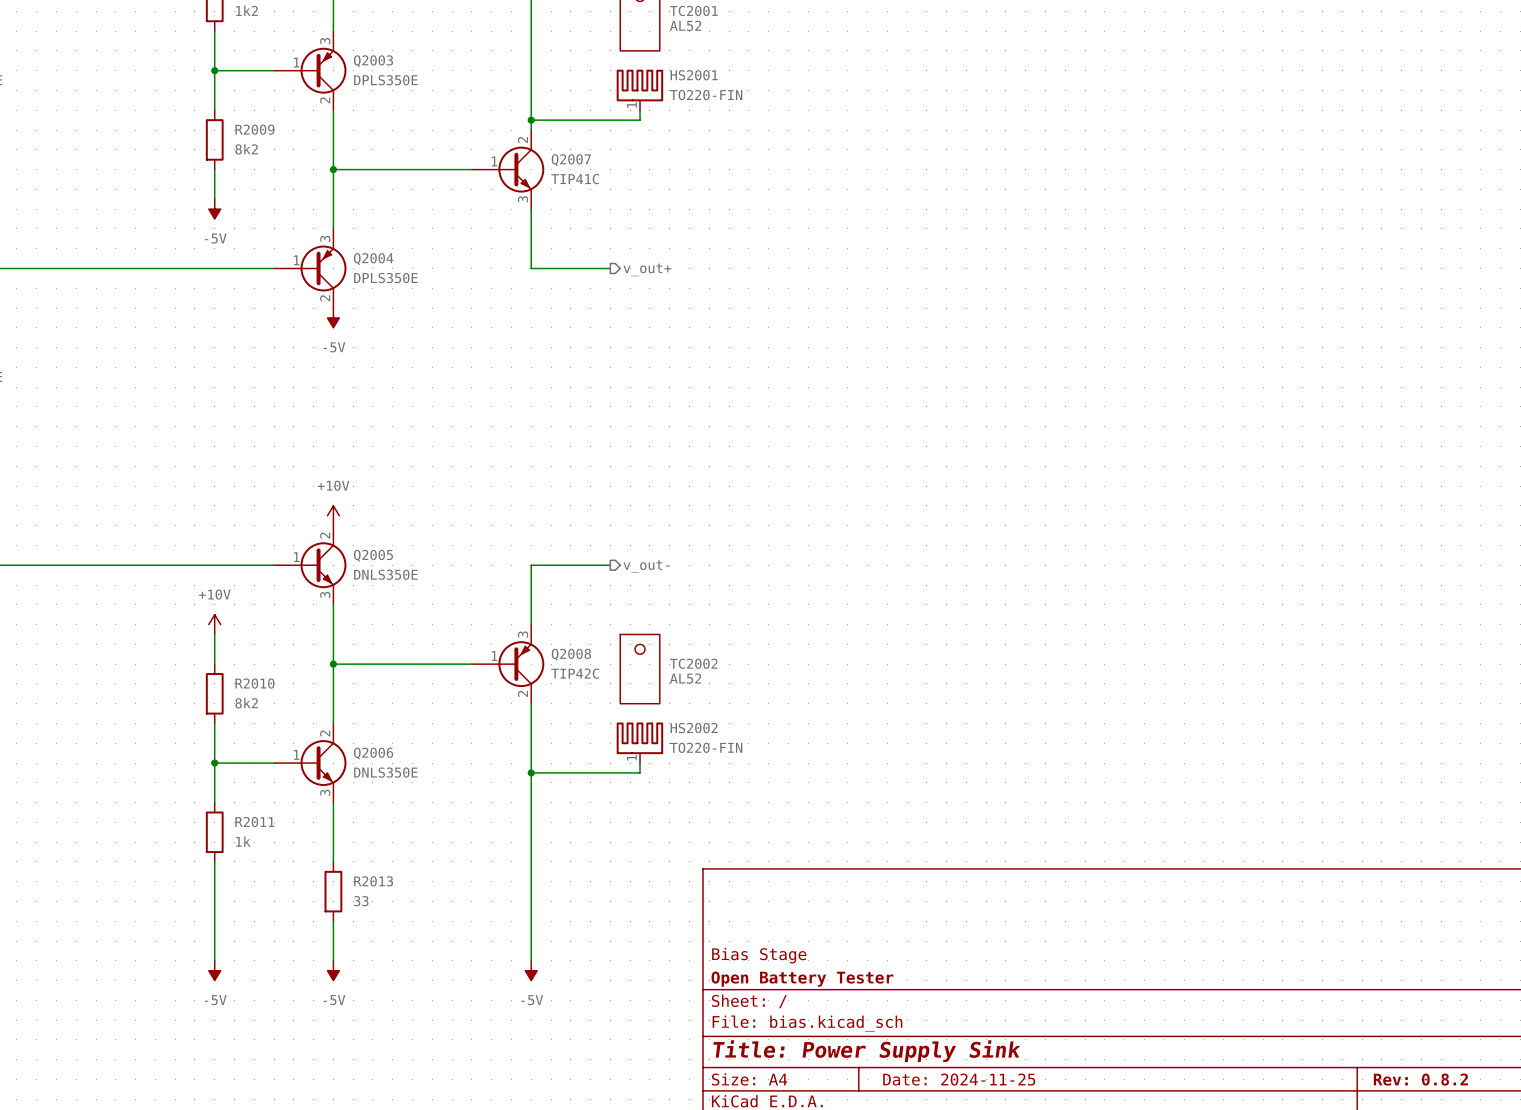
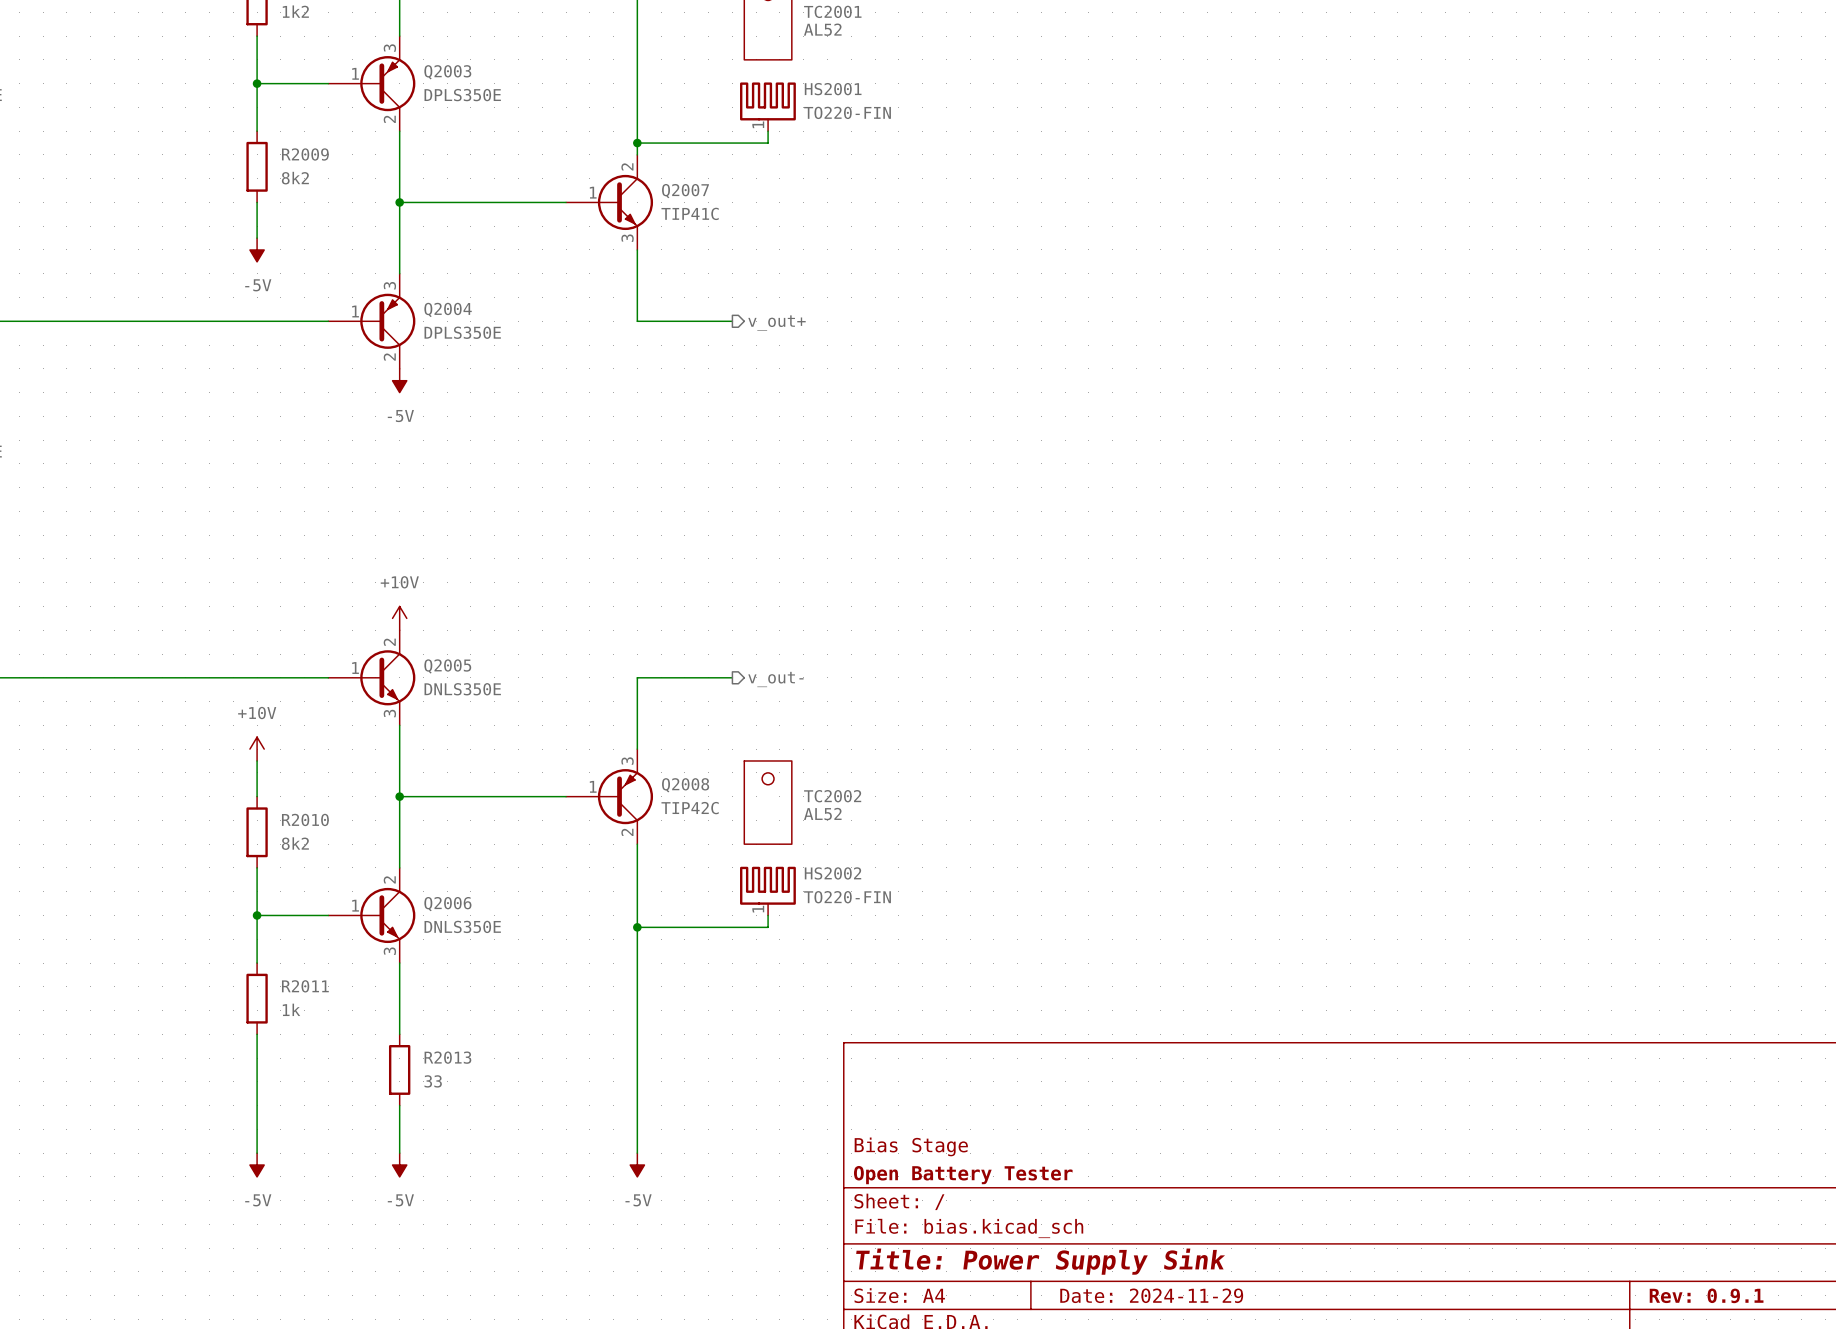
title block: Date: 2024-11-25 (959, 1079) -> Date: 2024-11-29 (1151, 1295)
title block: Rev: 0.8.2 (1420, 1079) -> Rev: 0.9.1 (1706, 1295)

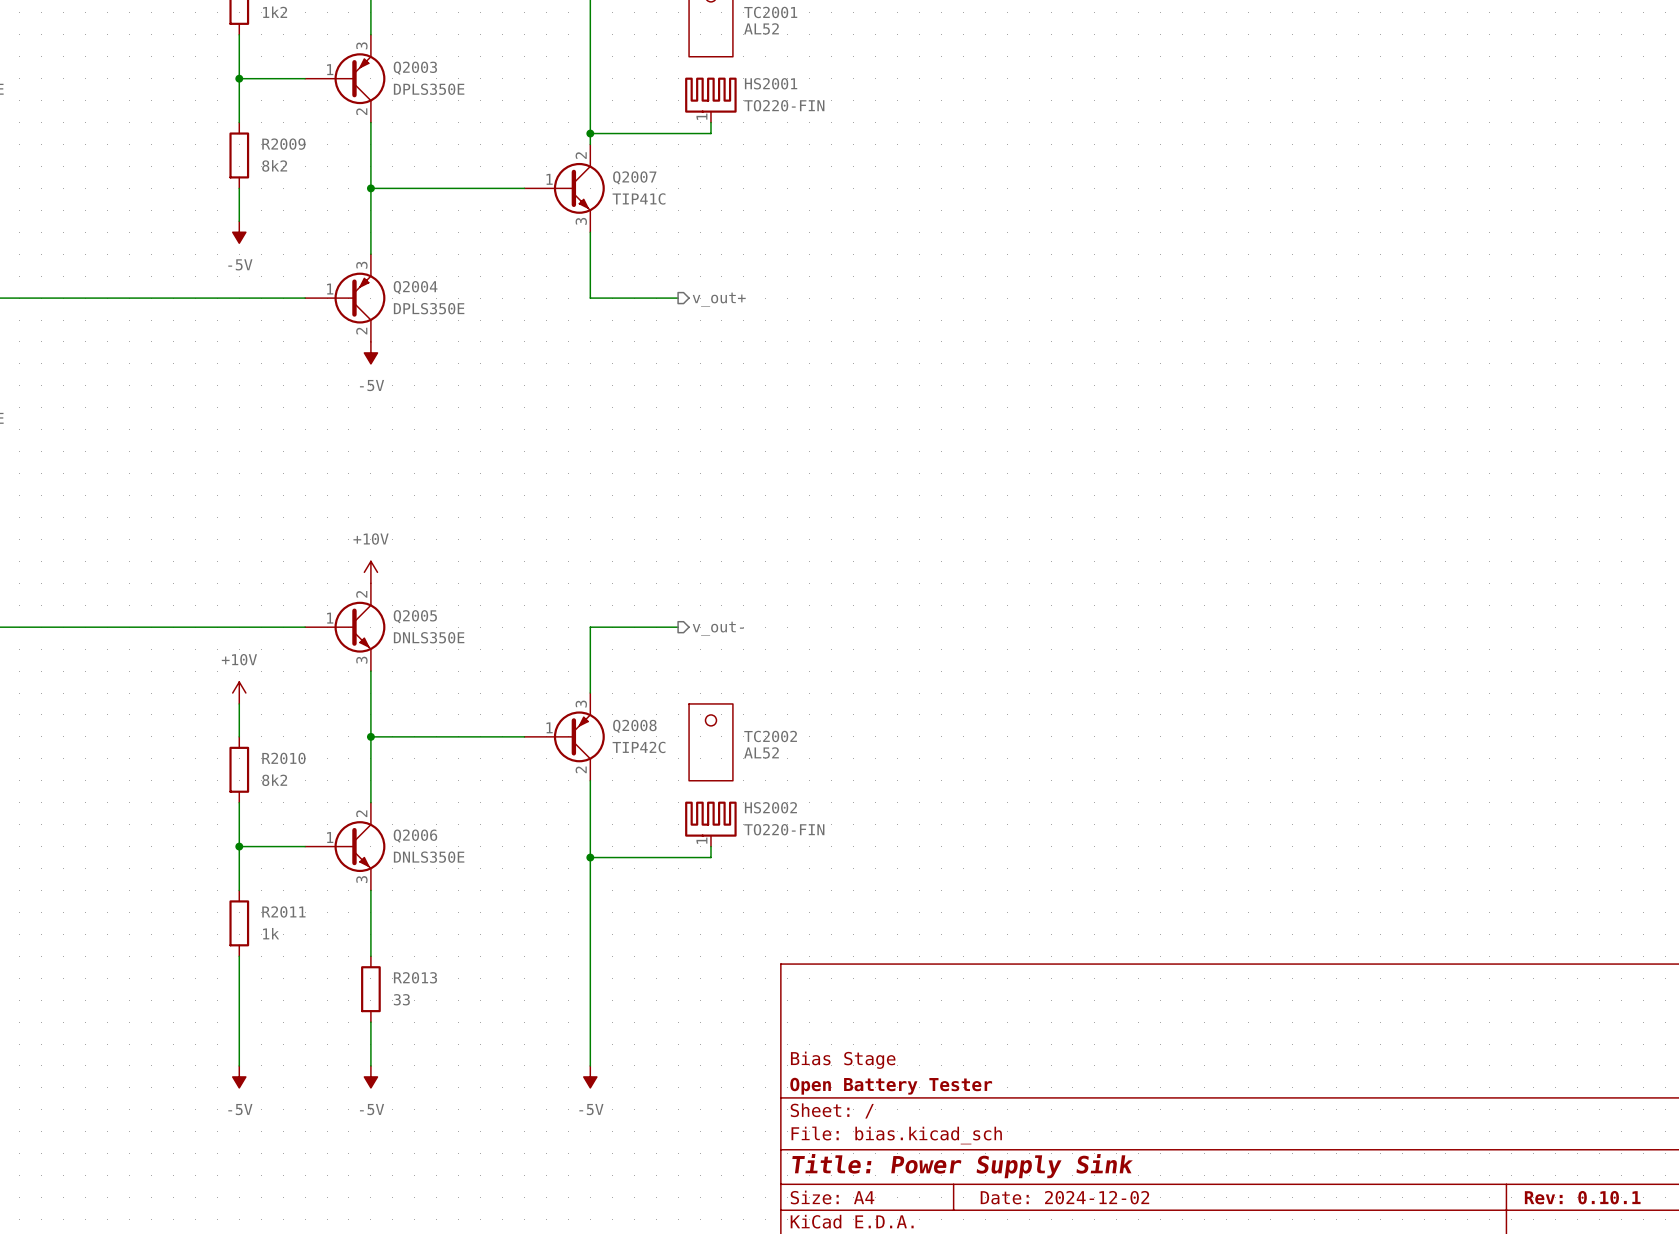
title block: Date: 2024-11-29 (1151, 1295) -> Date: 2024-12-02 (1064, 1197)
title block: Rev: 0.9.1 (1706, 1295) -> Rev: 0.10.1 (1582, 1197)

